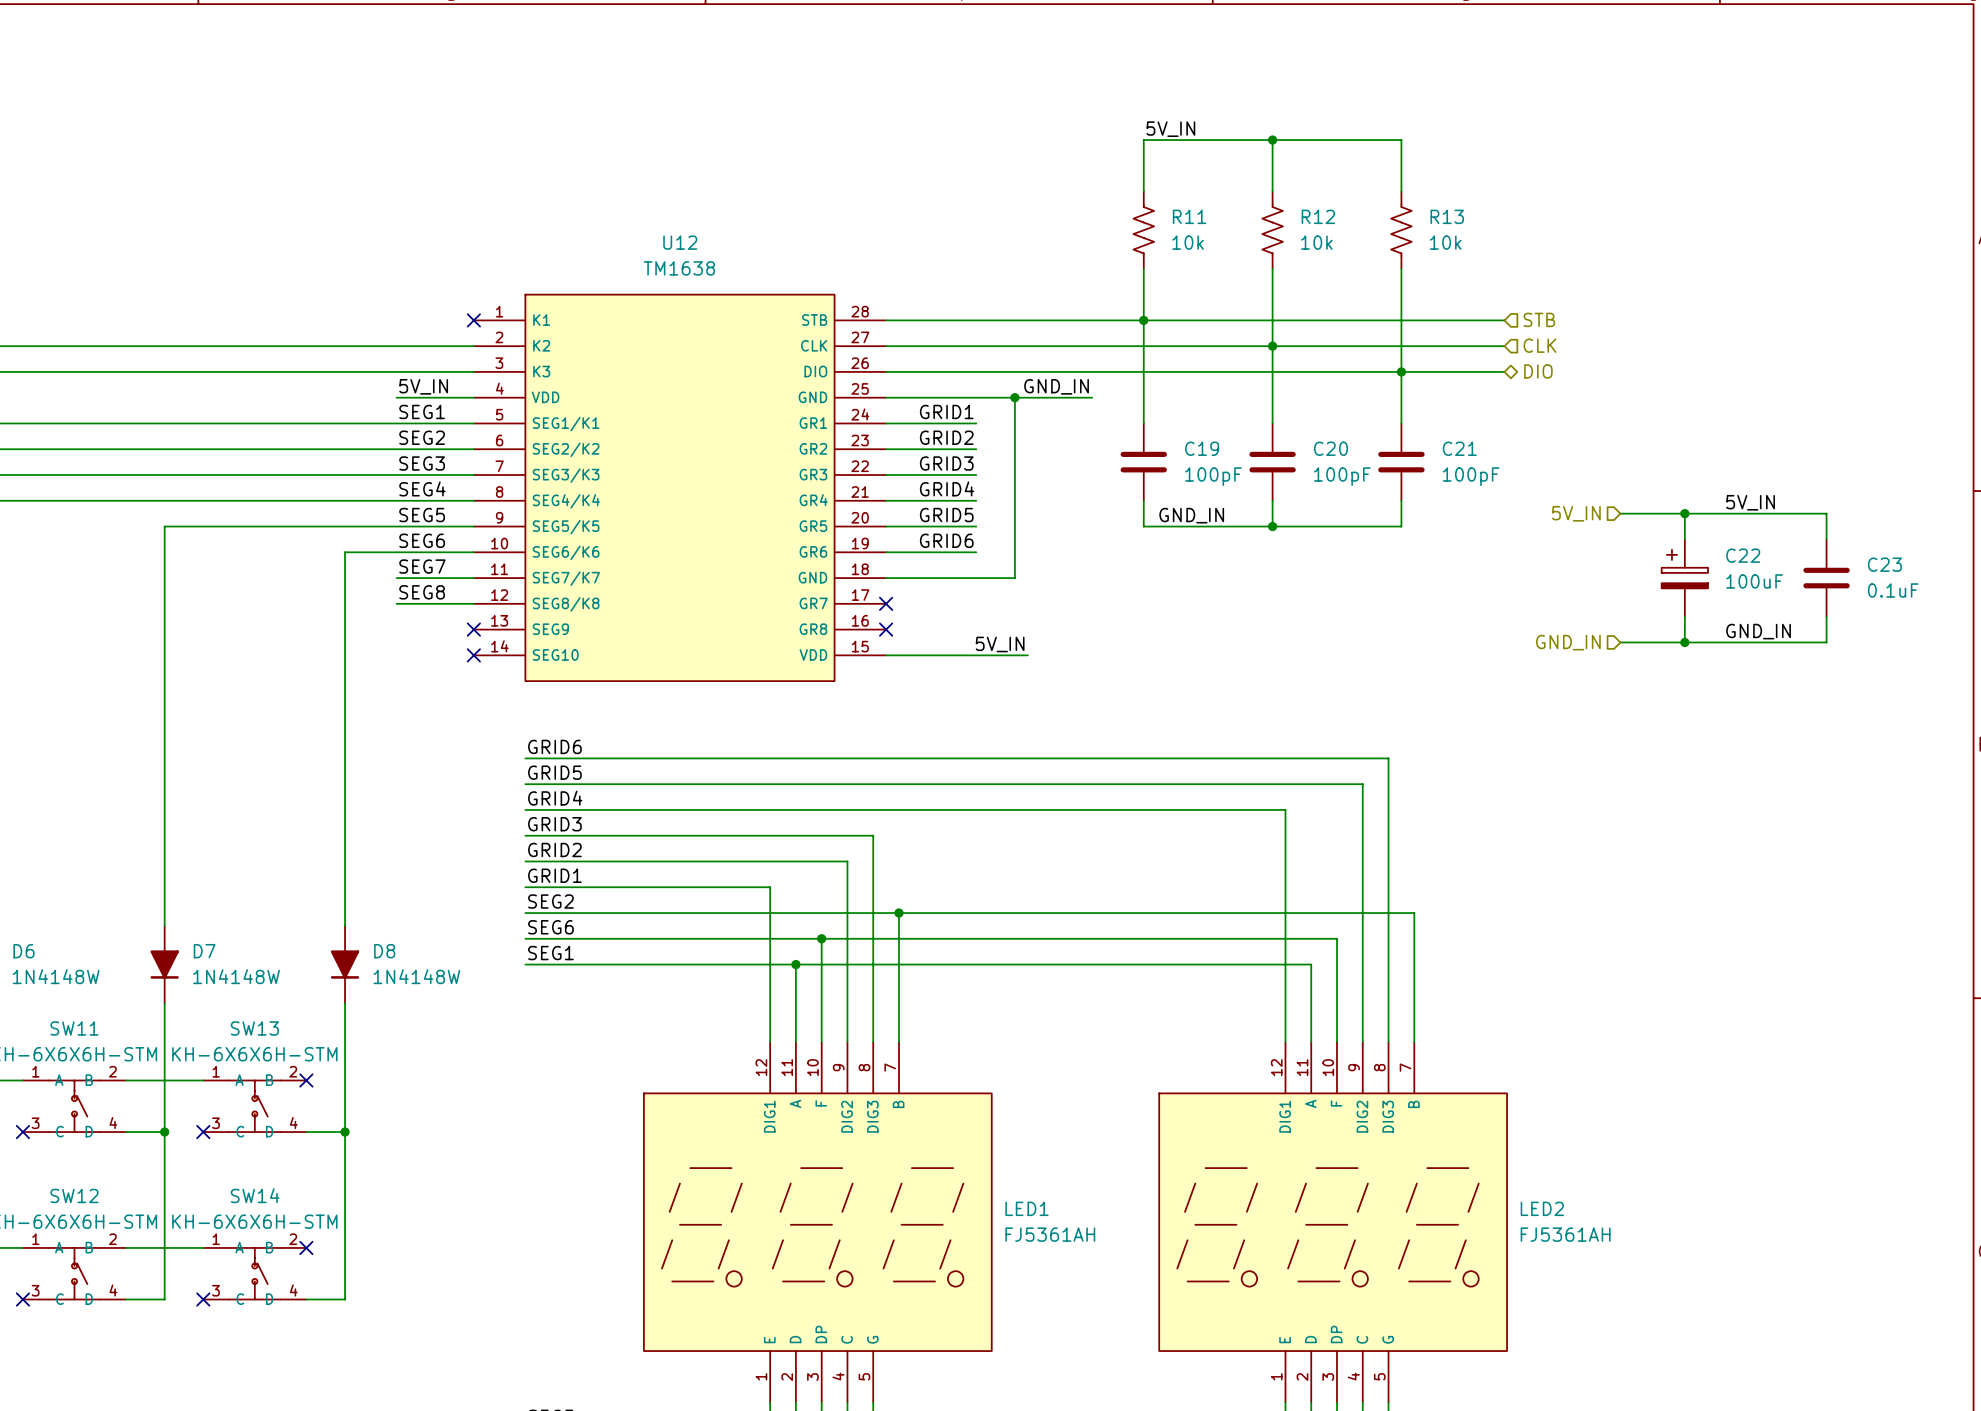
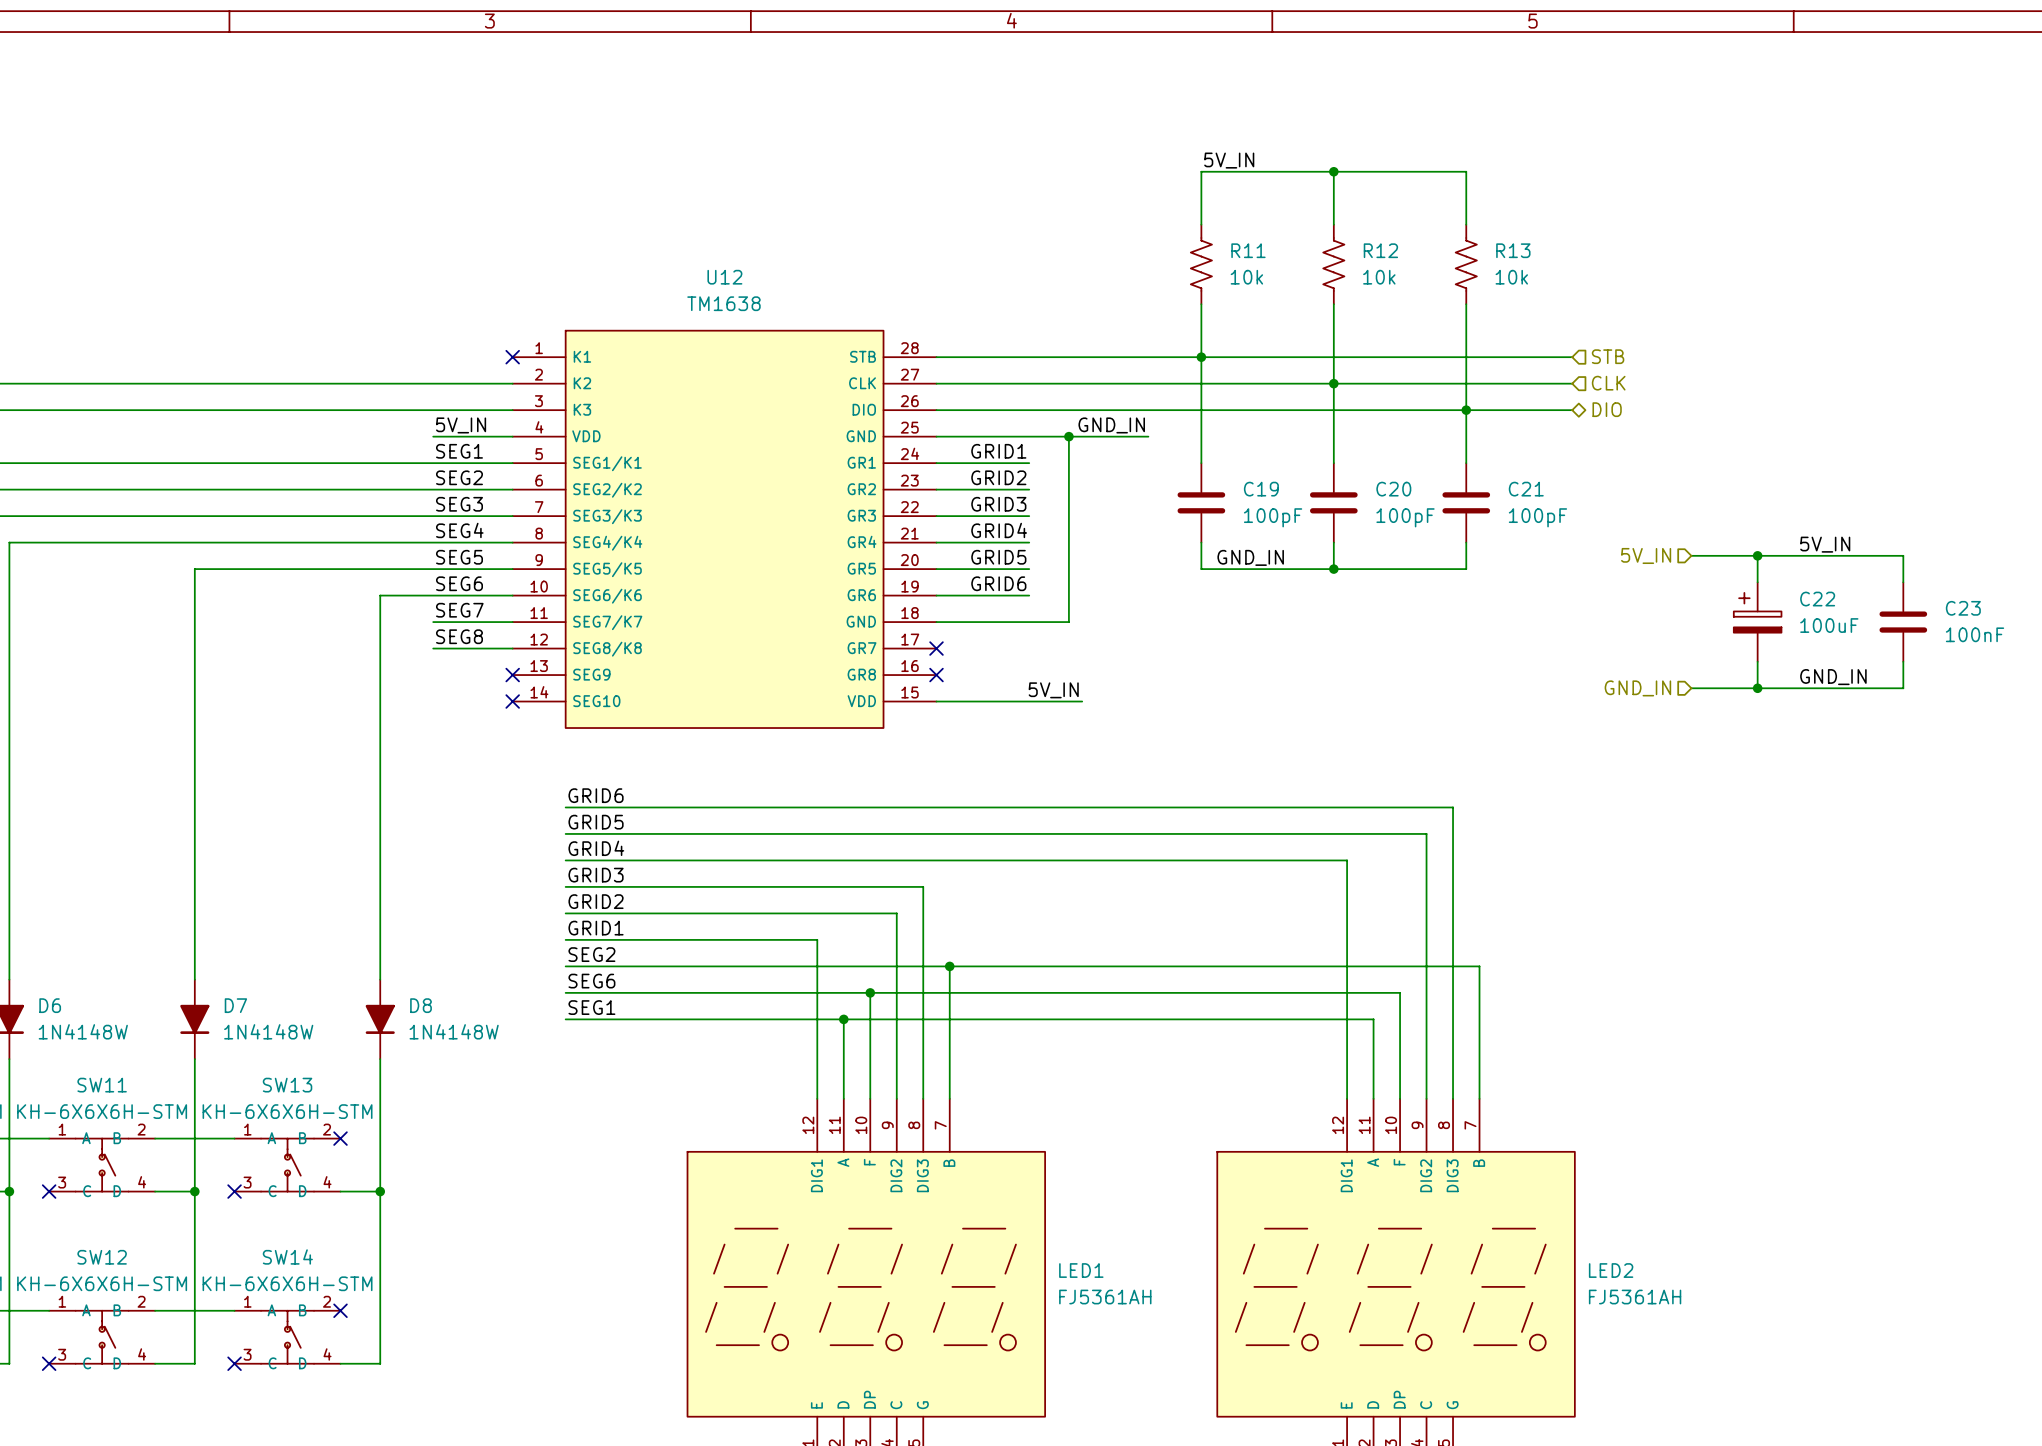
C23 value: 0.1uF (1893, 590) -> 100nF (1975, 634)

